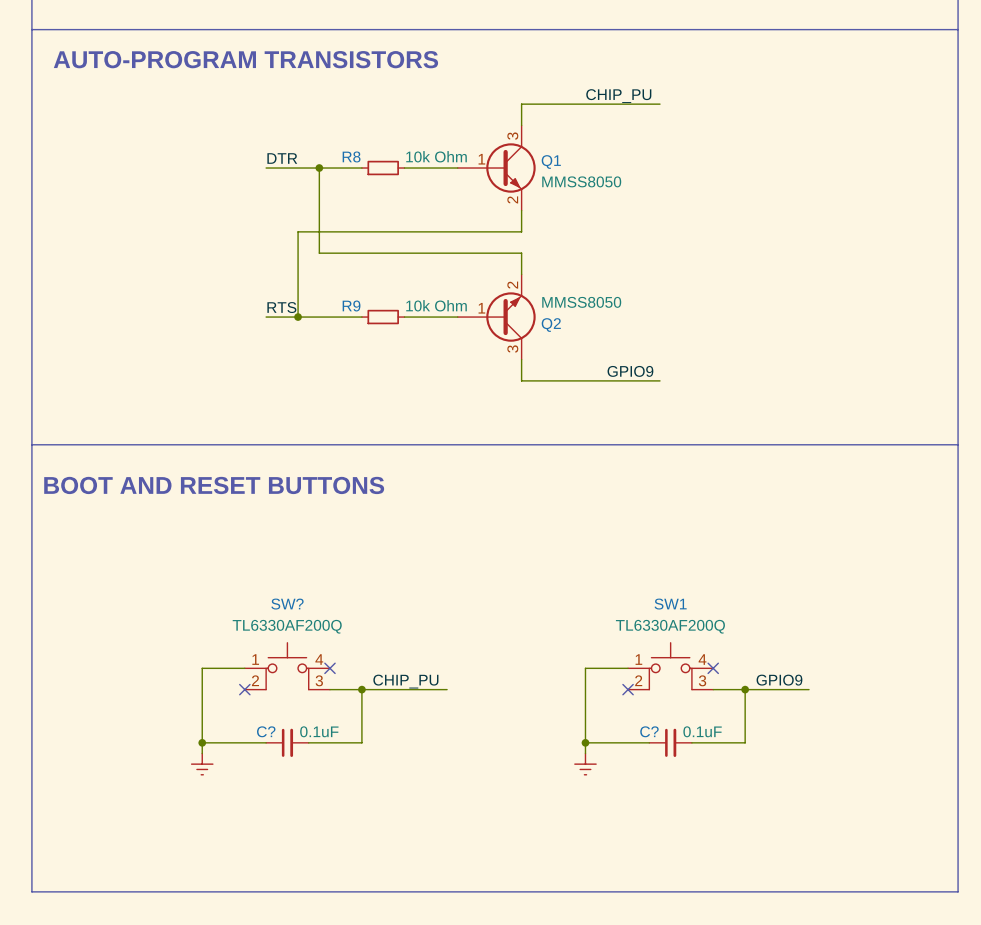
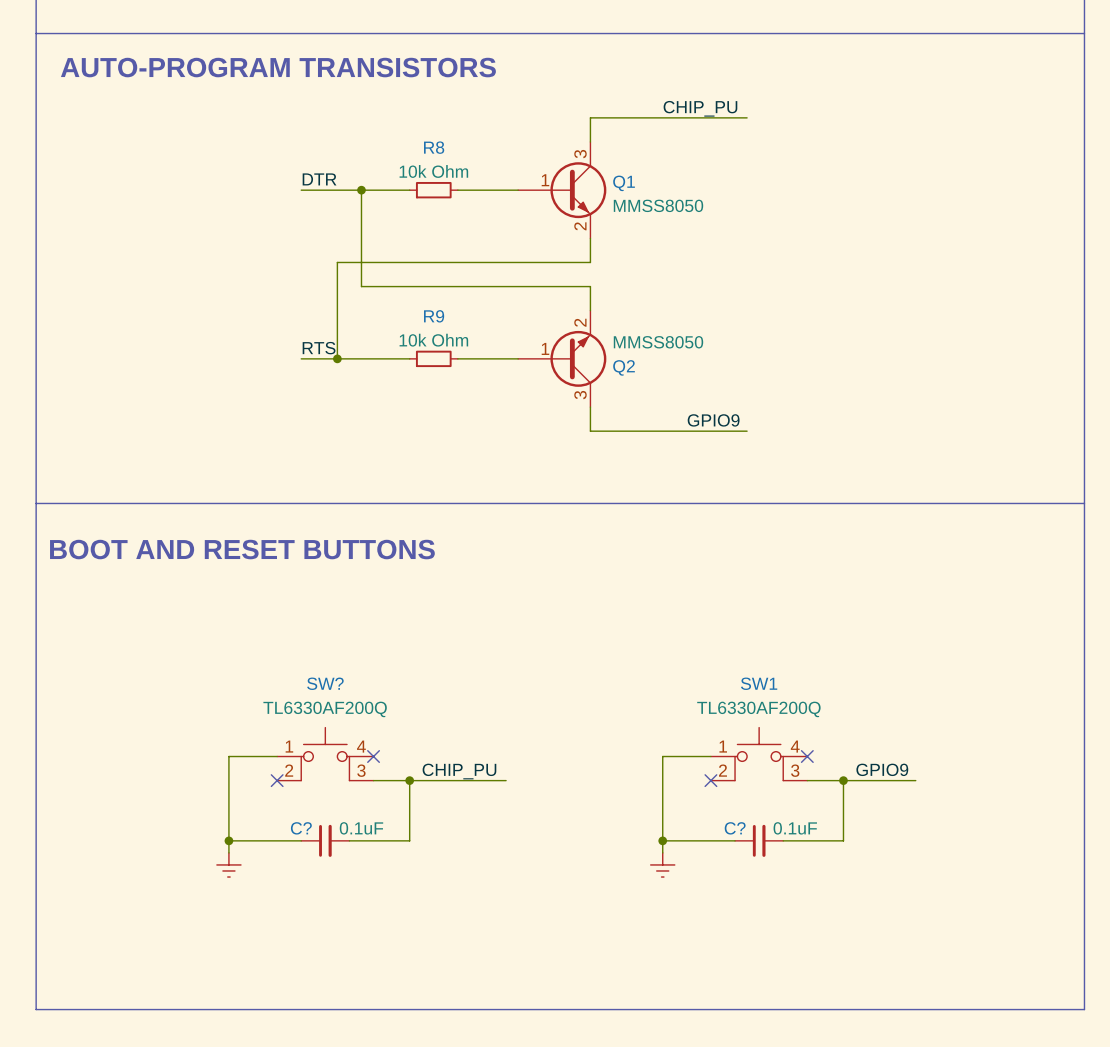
R8 name position: R8 (351, 156) -> R8 (434, 147)
R8 value position: 10k Ohm (436, 156) -> 10k Ohm (433, 171)
R9 name position: R9 (351, 305) -> R9 (434, 316)
R9 value position: 10k Ohm (436, 305) -> 10k Ohm (433, 340)

